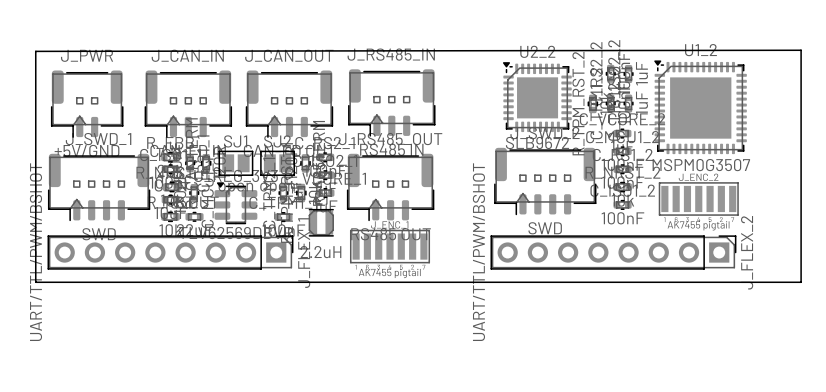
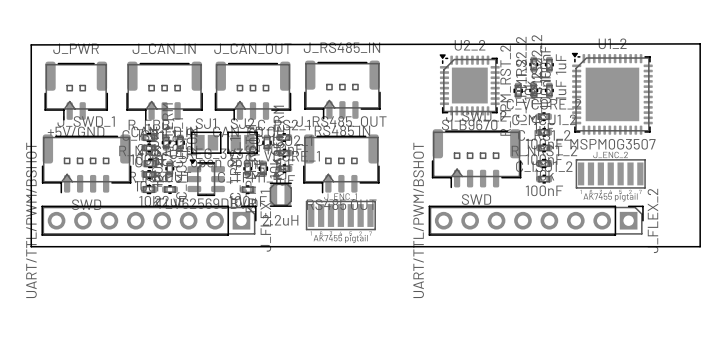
U2_2 value: SLB9672 (537, 142) -> SLB9670 (469, 124)

